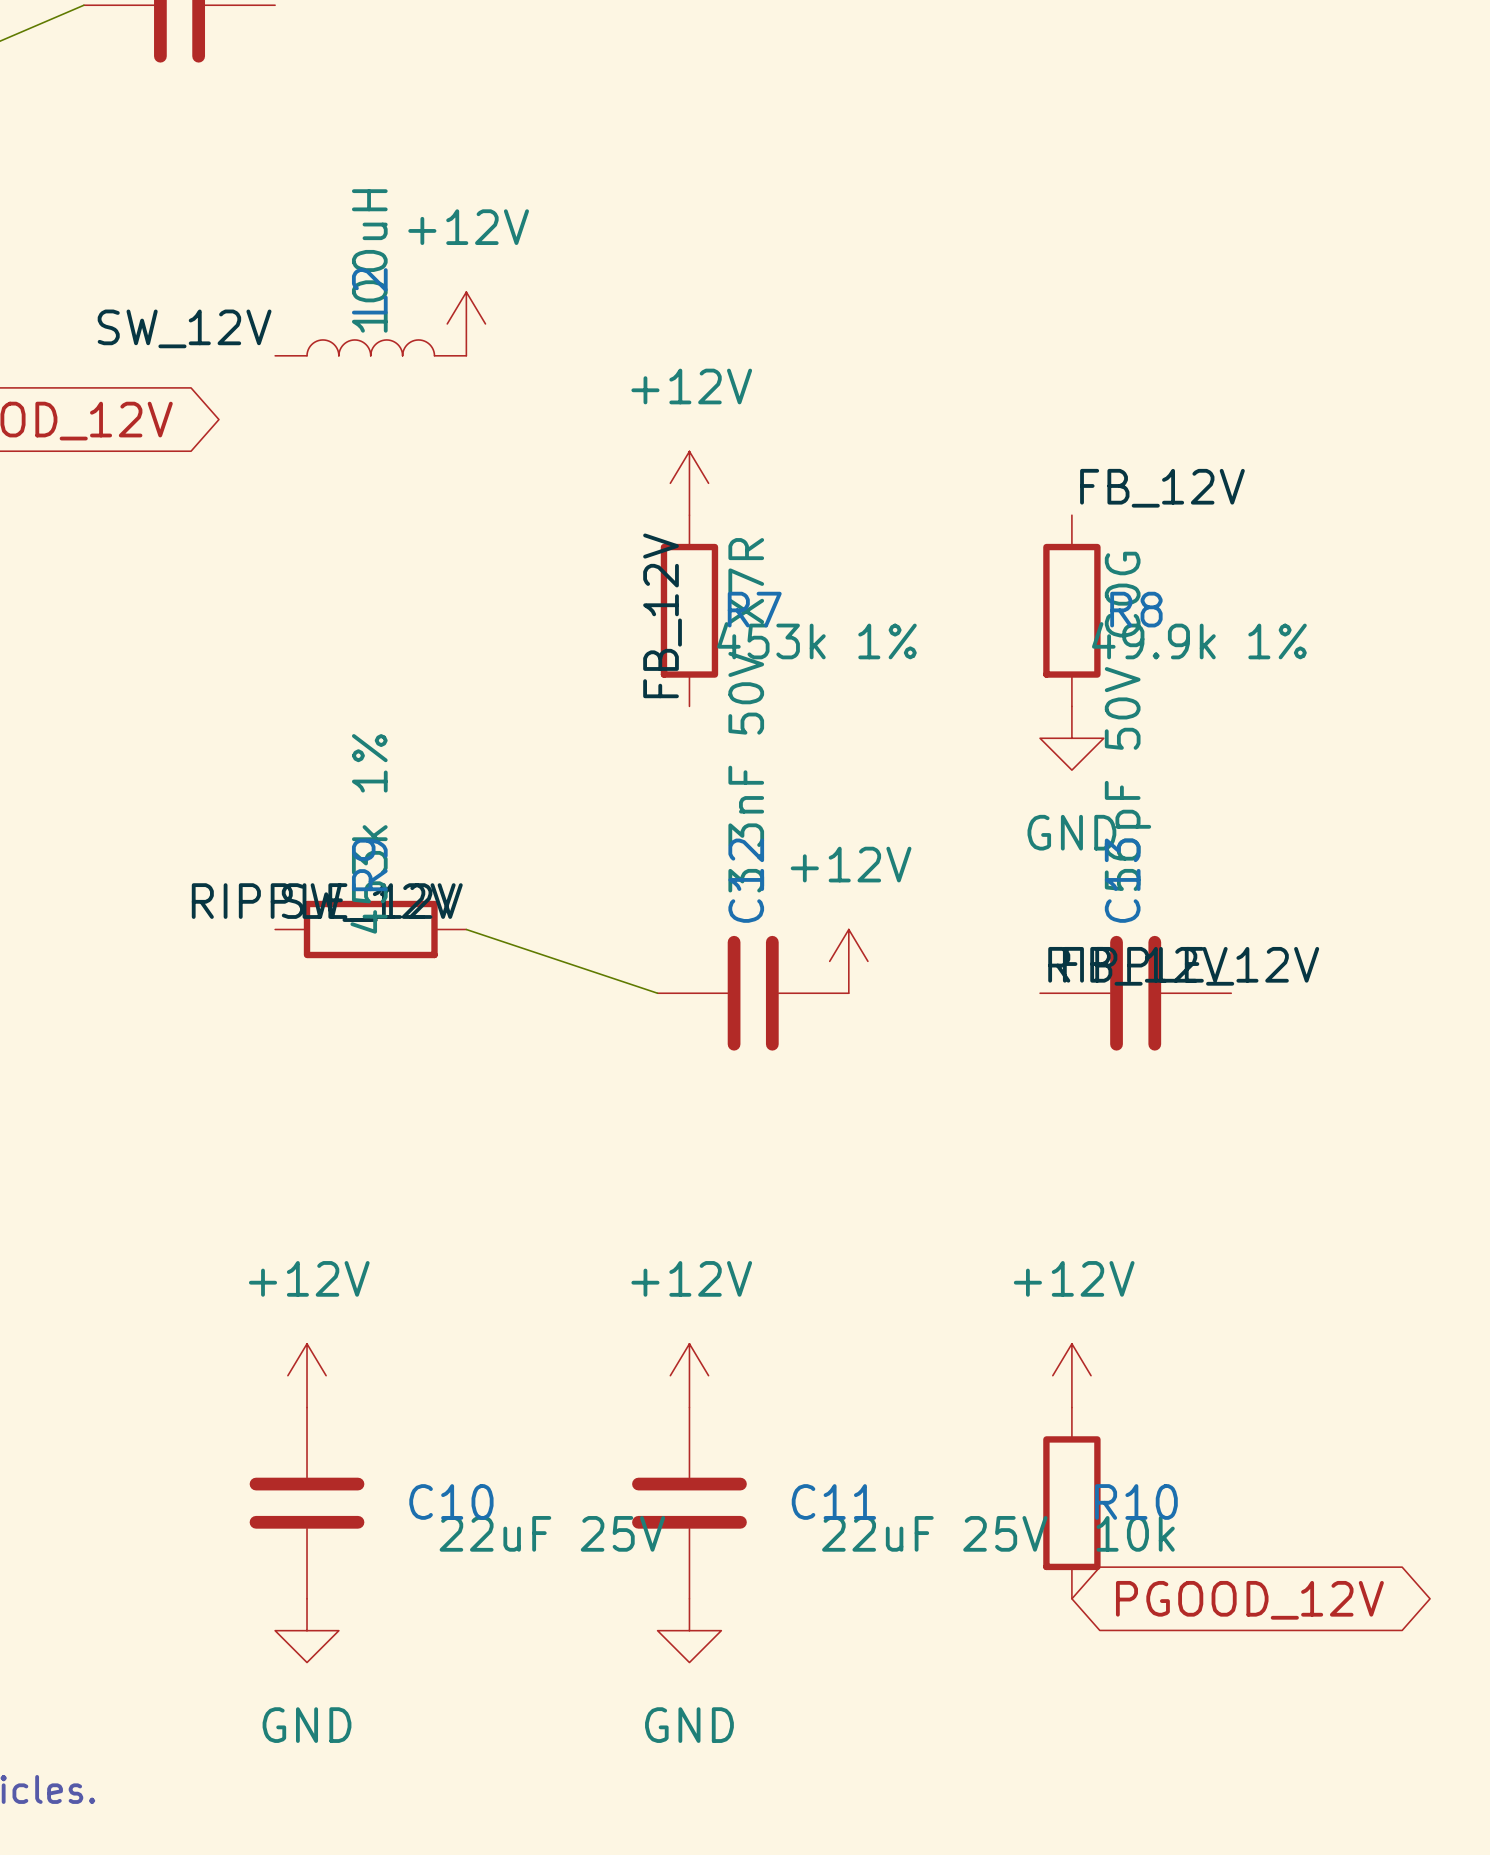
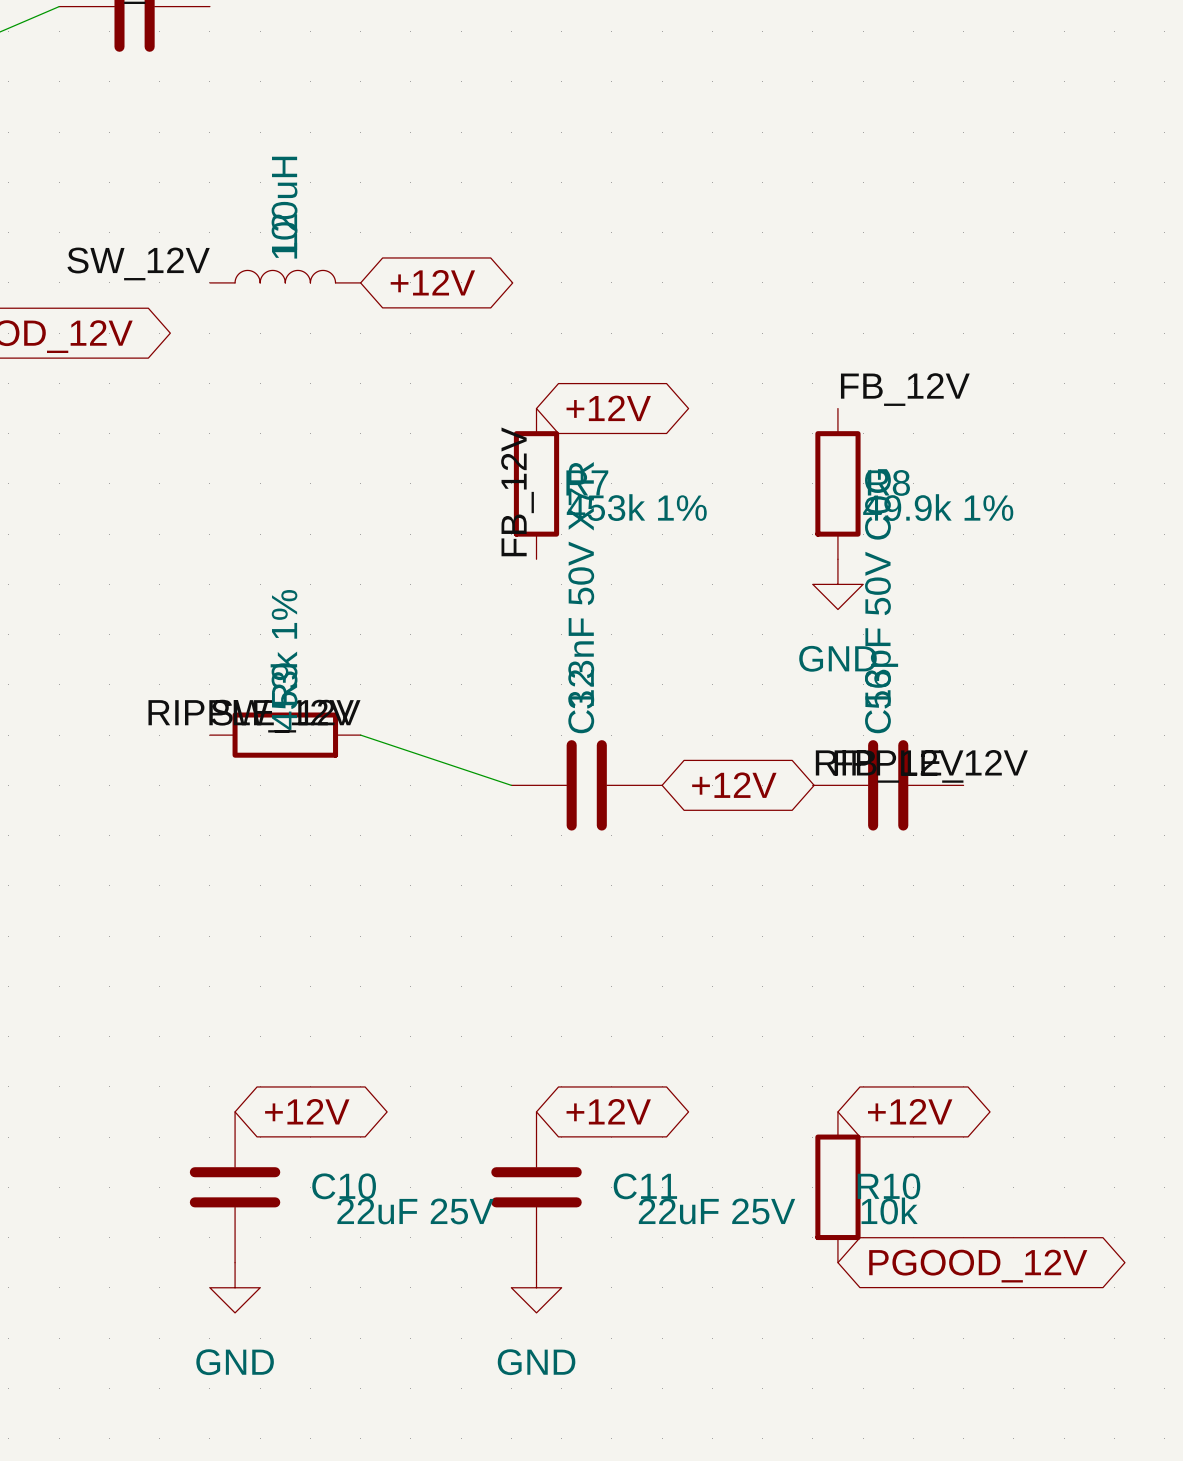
power symbol: +12V (466, 323) -> none
global label: none -> +12V (432, 282)
power symbol: +12V (689, 483) -> none
global label: none -> +12V (608, 408)
power symbol: +12V (848, 961) -> none
global label: none -> +12V (734, 785)
power symbol: +12V (307, 1375) -> none
power symbol: +12V (689, 1375) -> none
power symbol: +12V (1071, 1375) -> none
global label: none -> +12V (307, 1111)
global label: none -> +12V (608, 1111)
global label: none -> +12V (910, 1111)

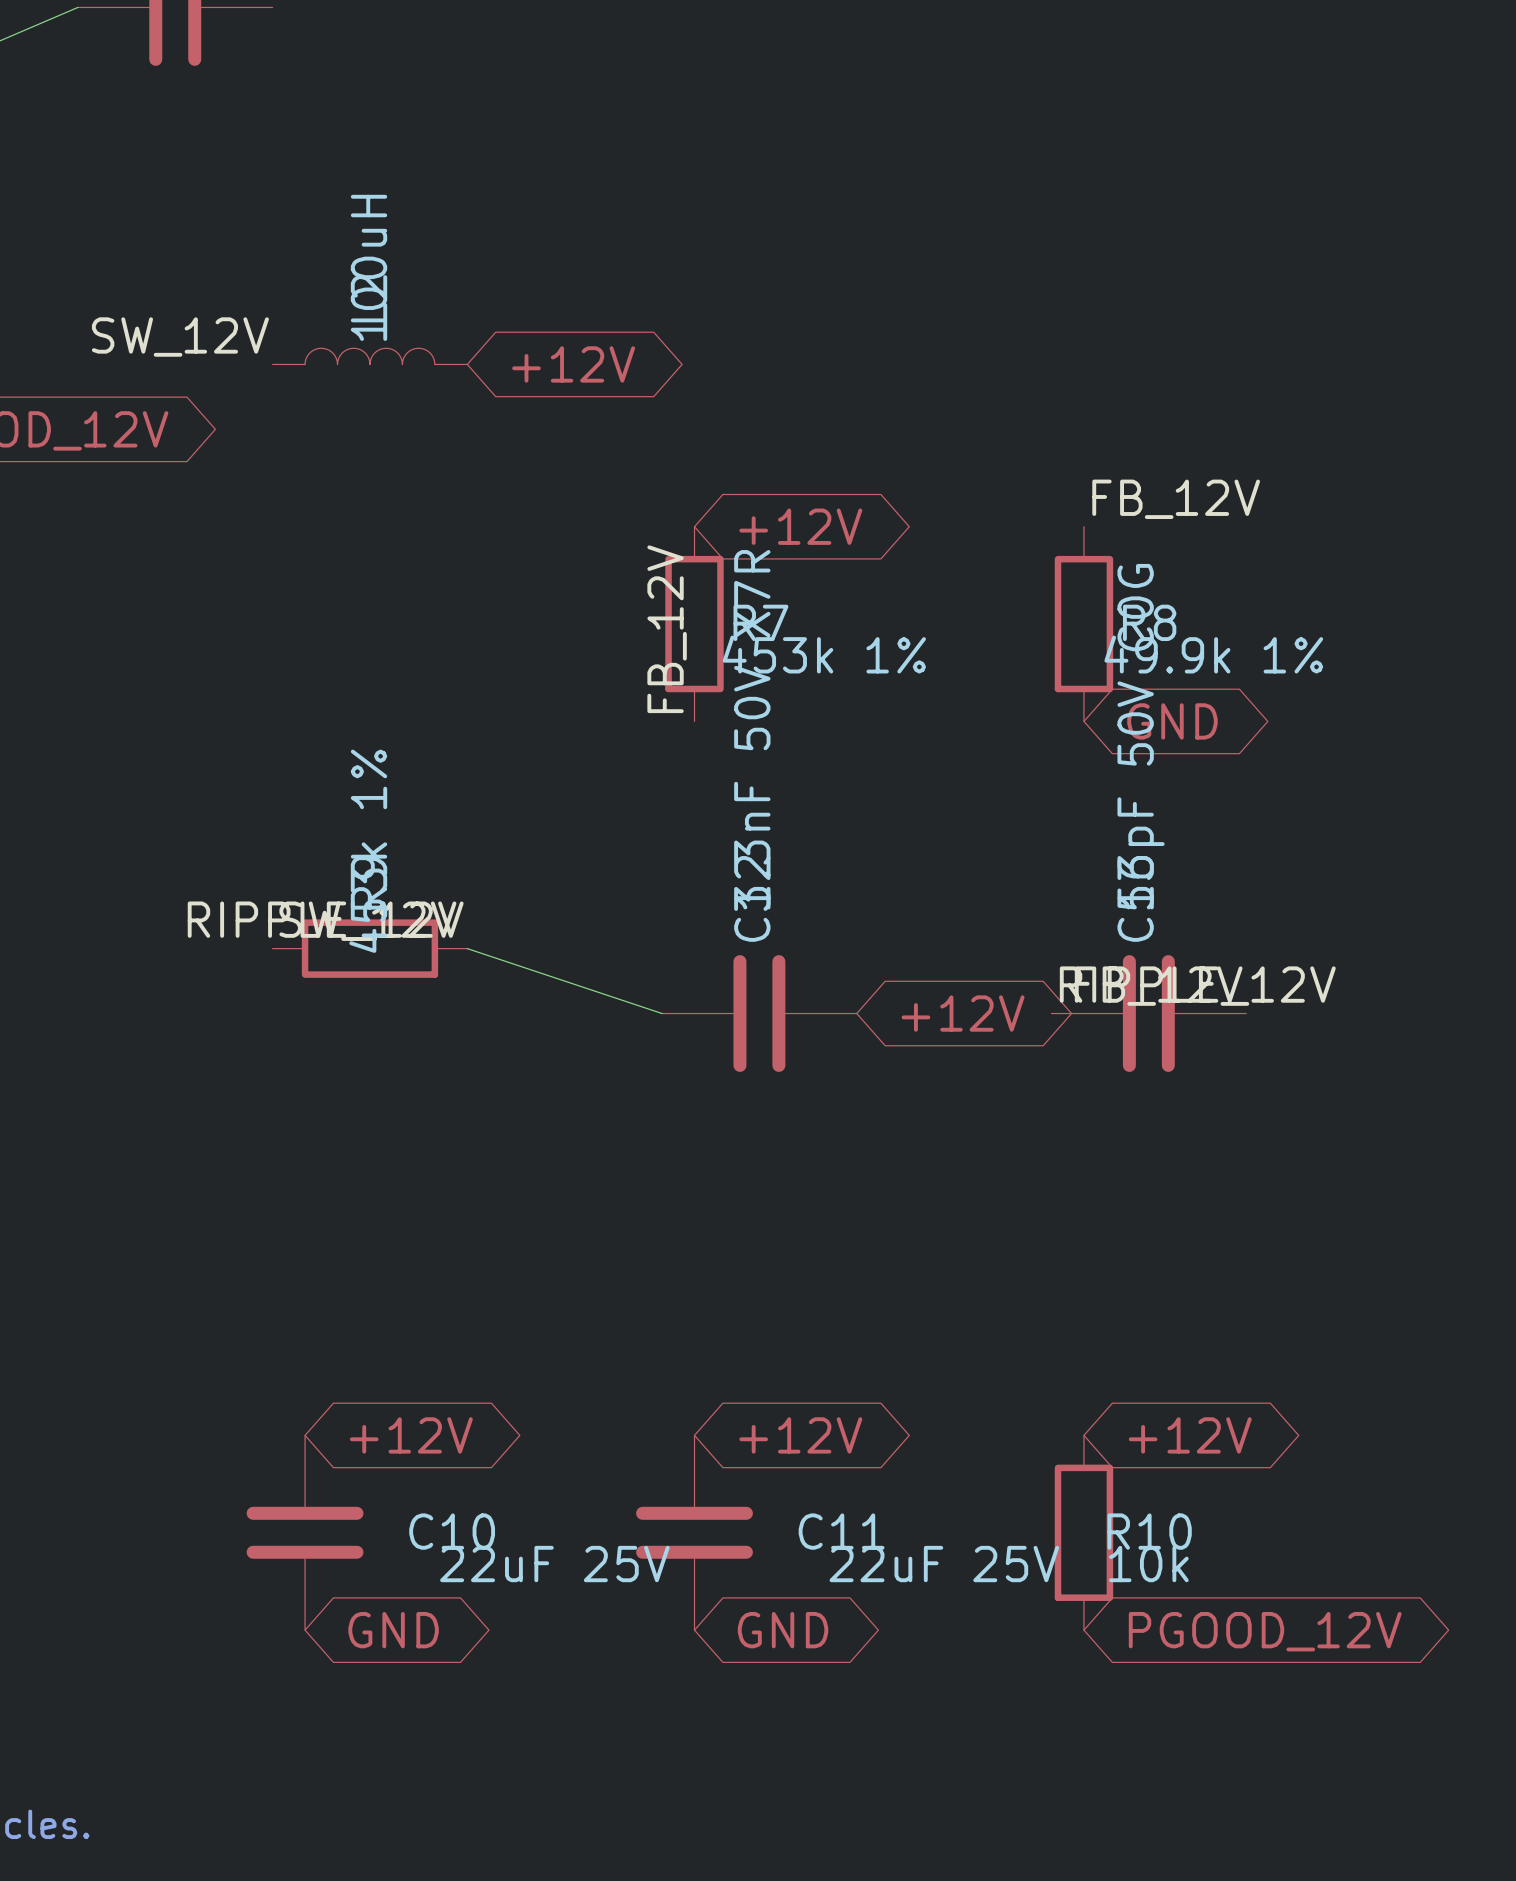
global label: none -> GND (1172, 721)
power symbol: GND (837, 584) -> none
global label: none -> GND (393, 1630)
global label: none -> GND (783, 1630)
power symbol: GND (235, 1287) -> none
power symbol: GND (536, 1287) -> none

